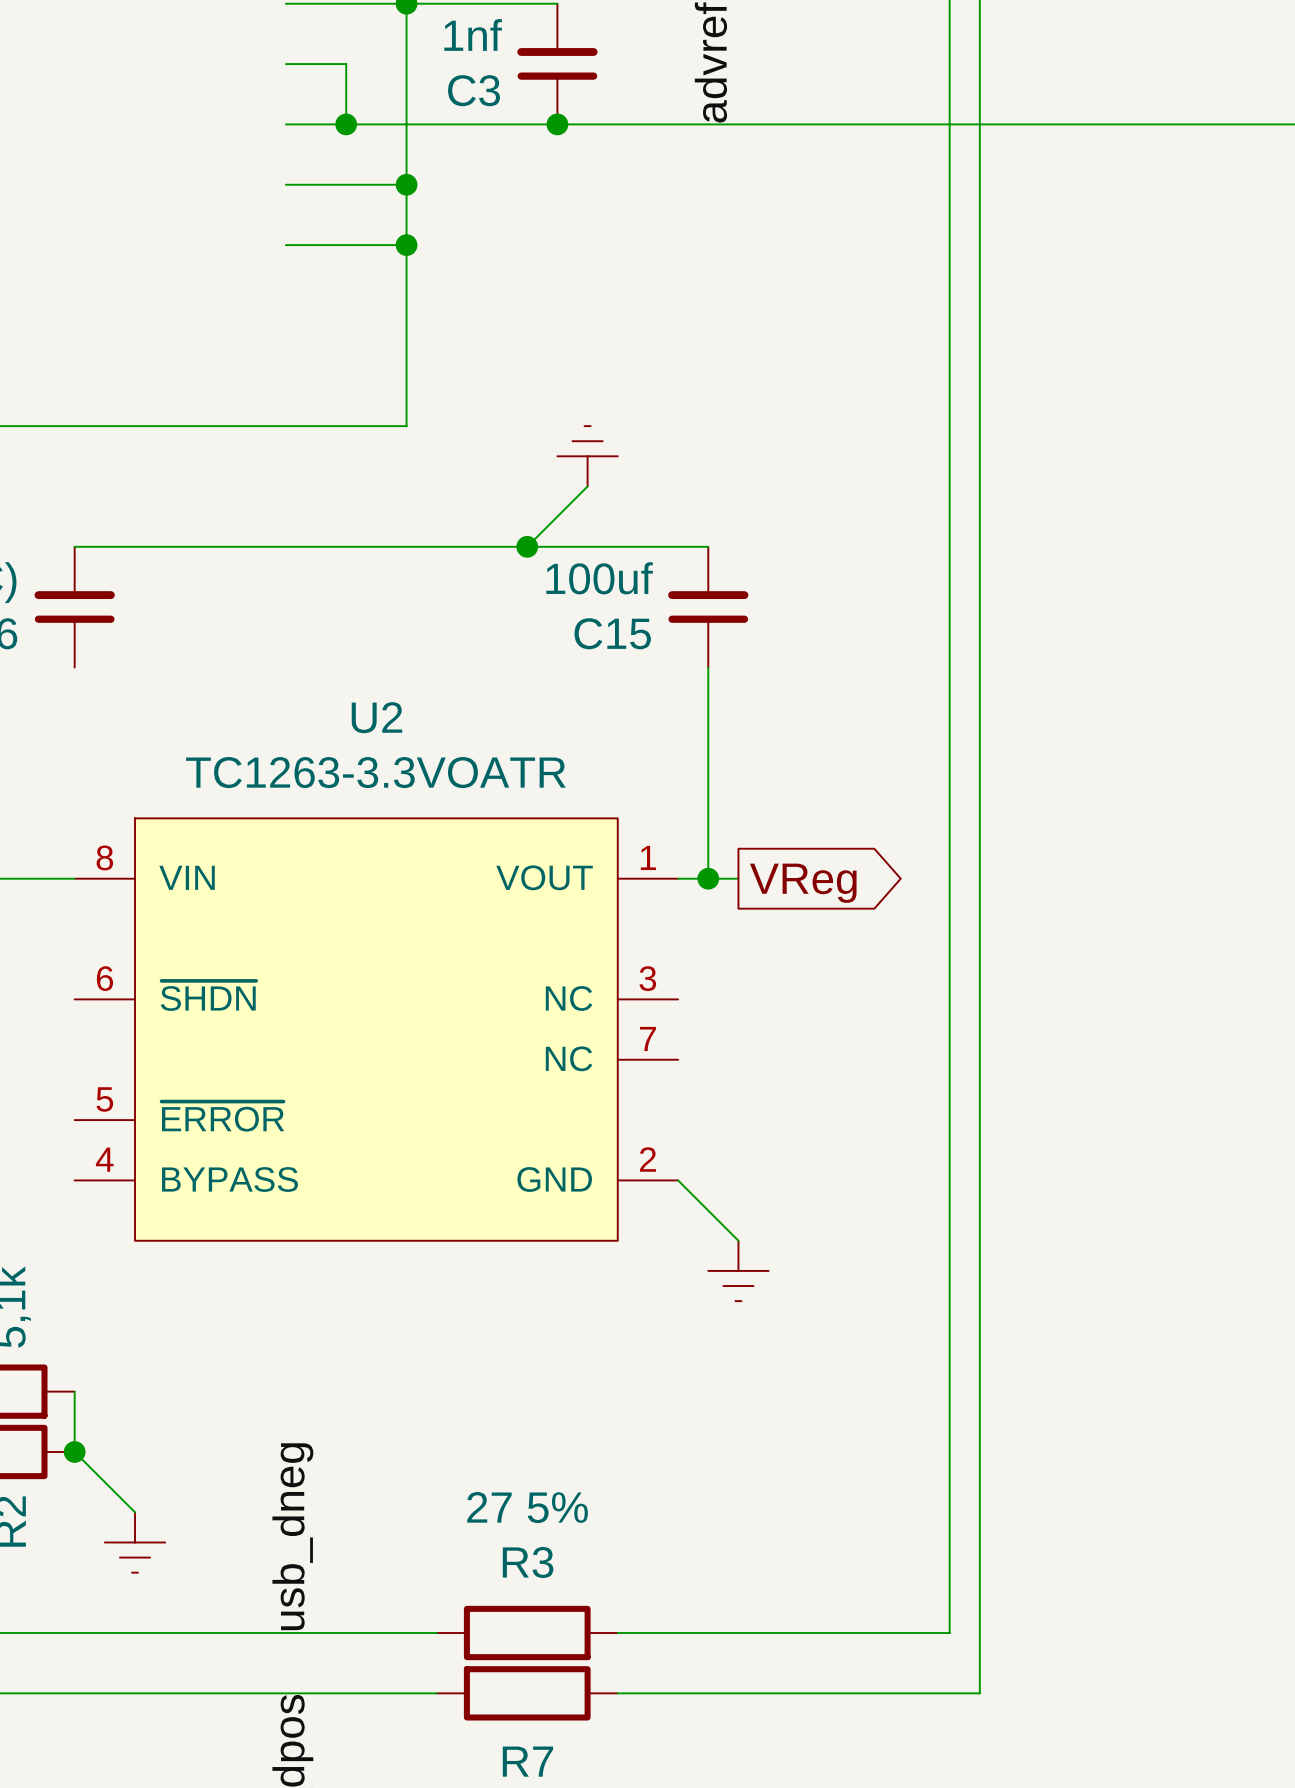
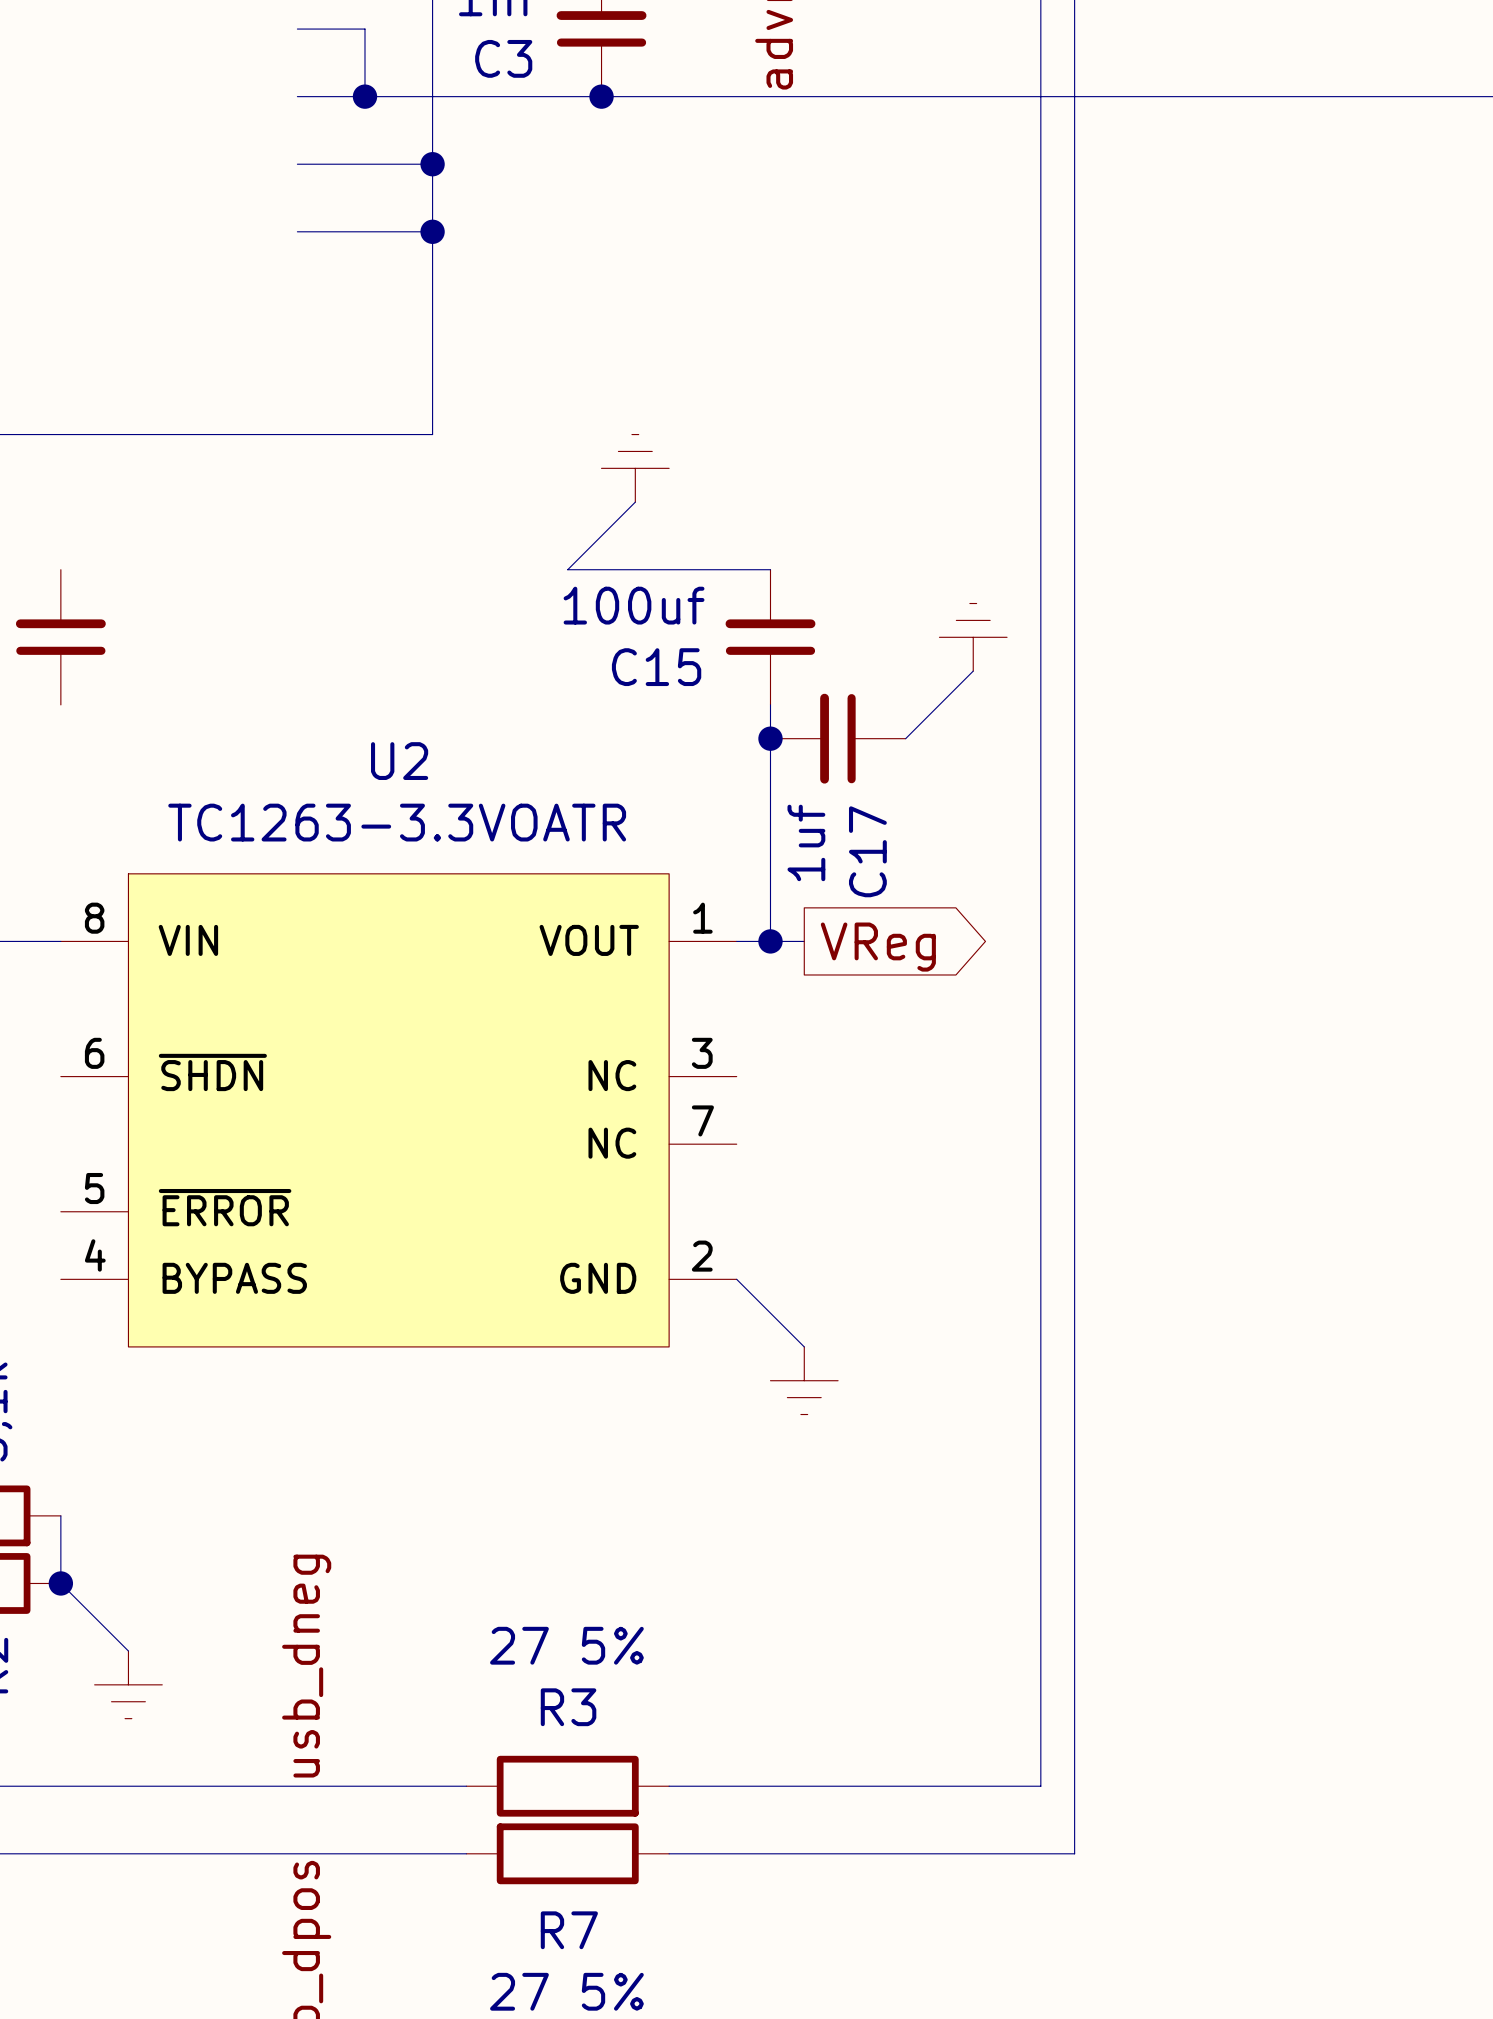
wire: (74, 546) (527, 546) -> none
junction: (527, 546) -> none
power symbol: none -> (973, 637)
wire: none -> (973, 671) (905, 738)
junction: none -> (770, 738)
C17: none -> 1uf (838, 738)

